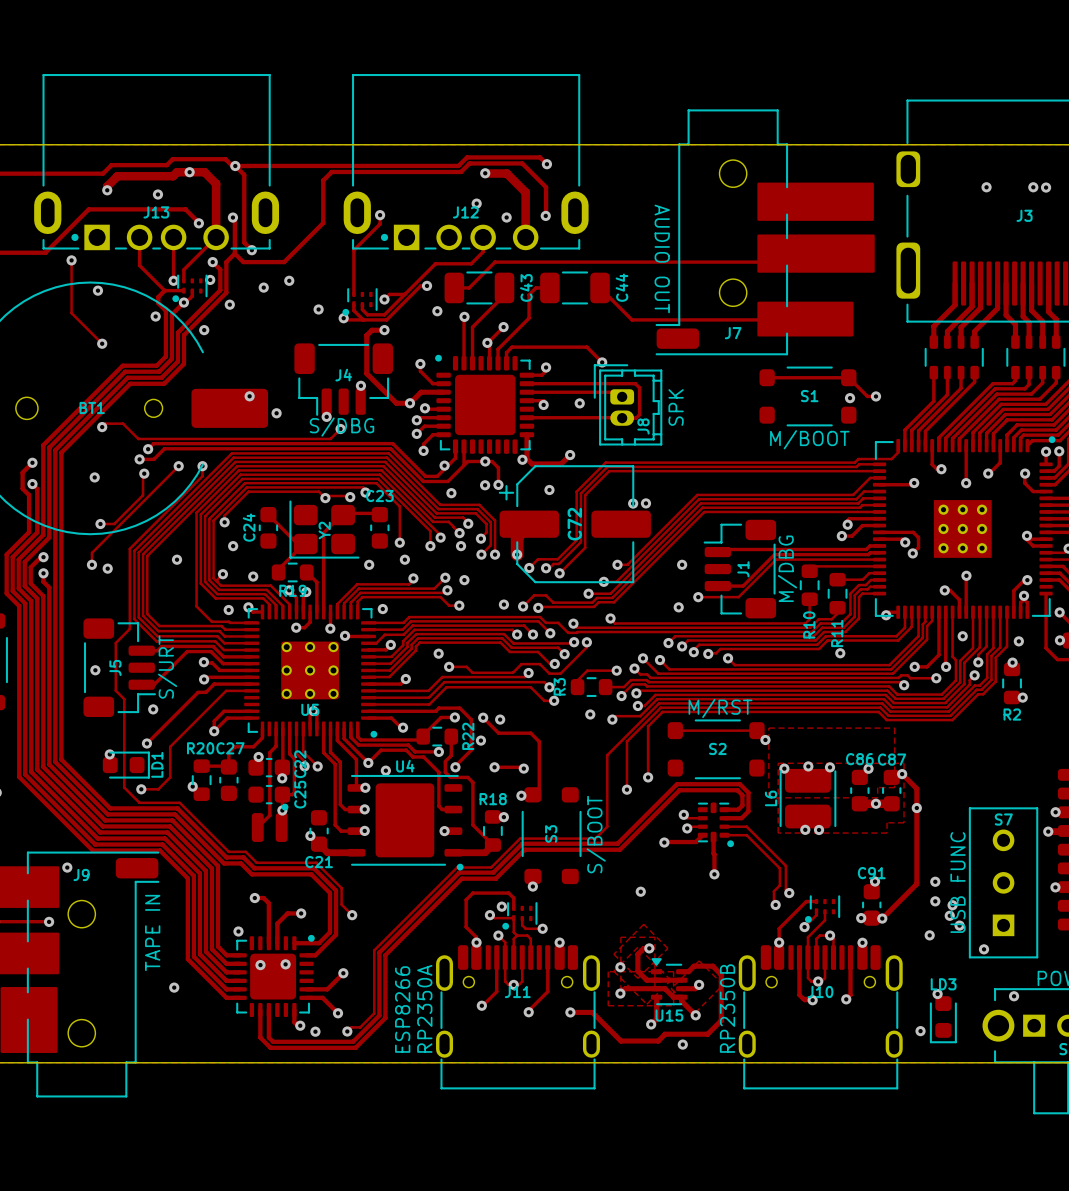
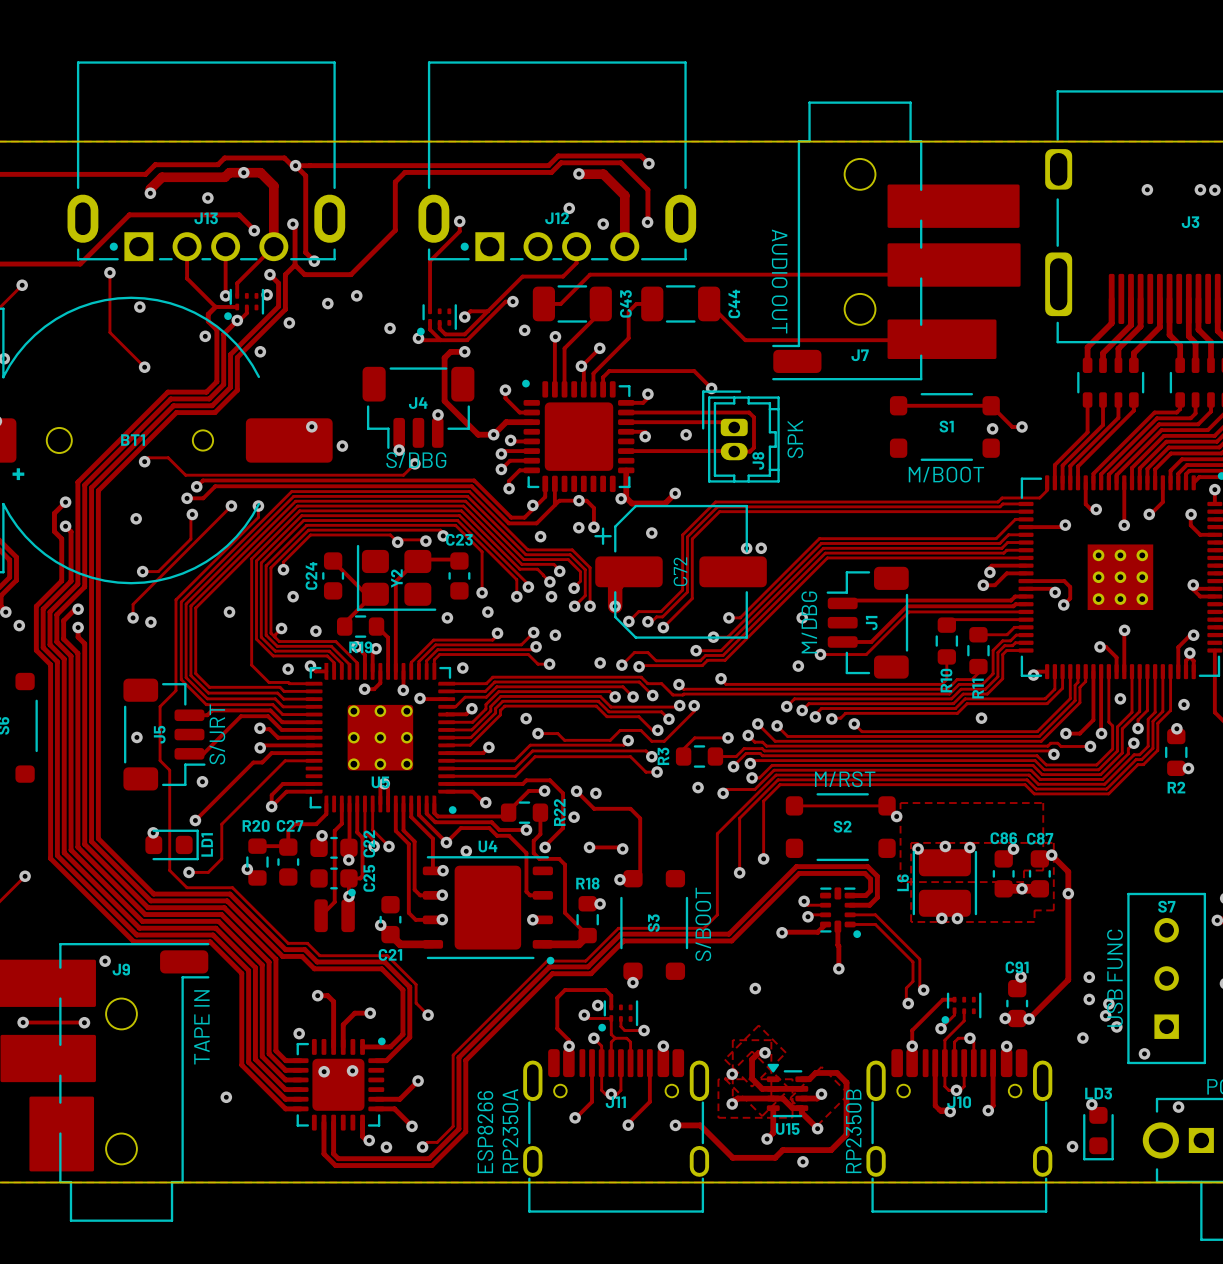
text position: M/DBG (787, 568) -> M/DBG (809, 622)

